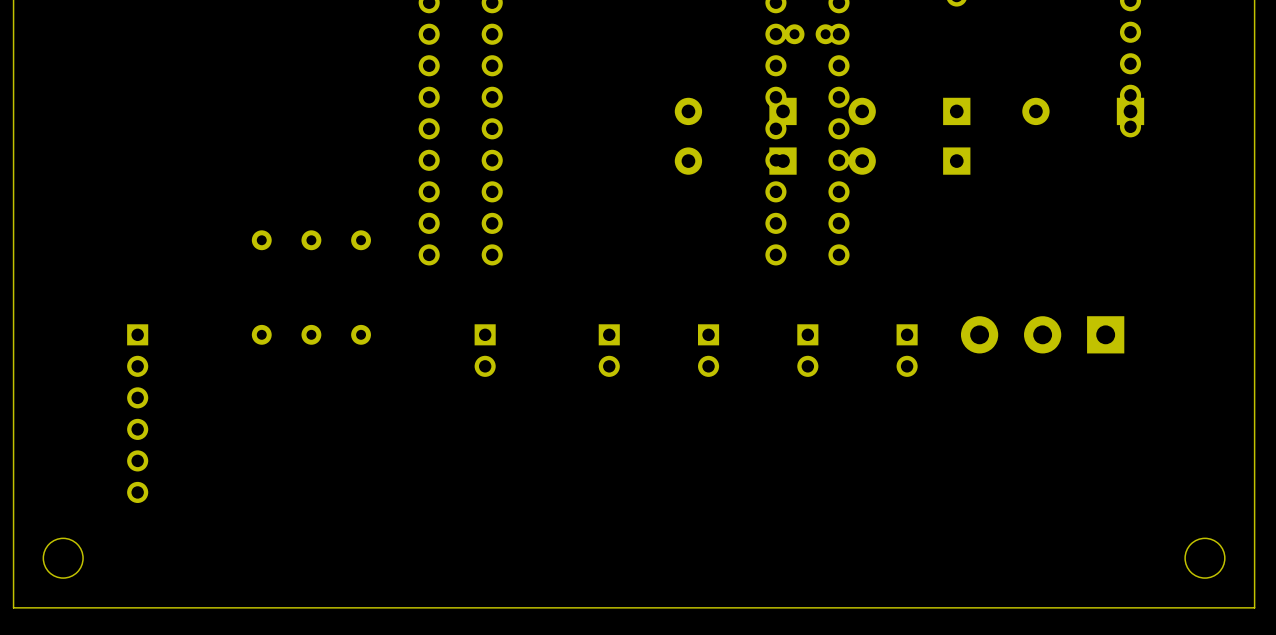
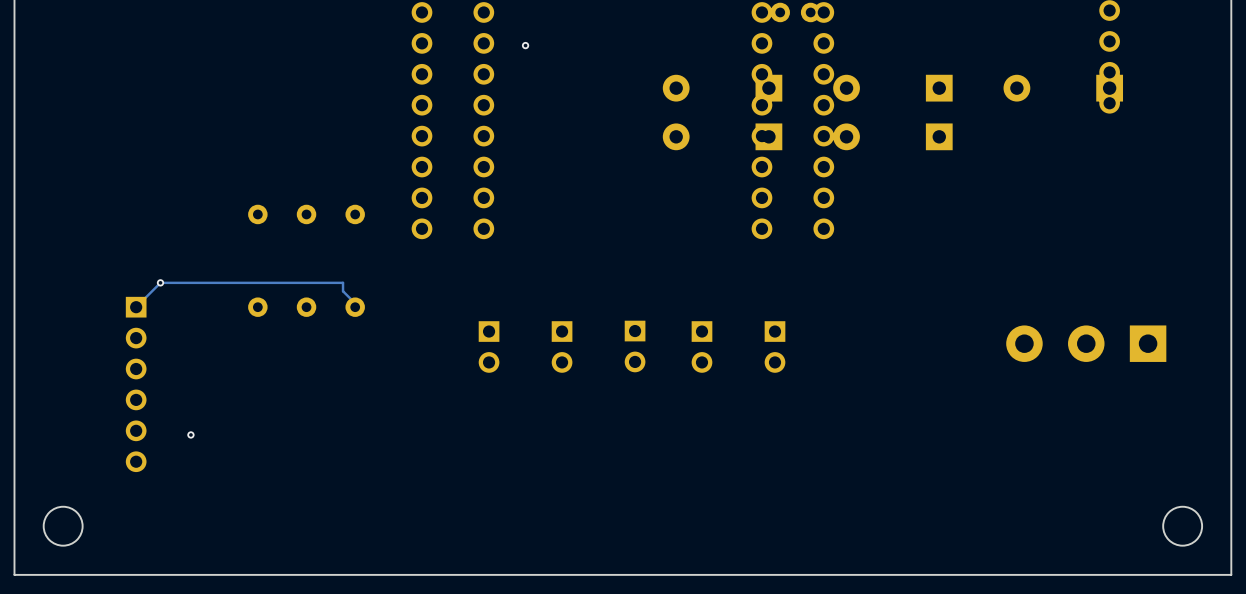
via: none -> (525, 45)
via: none -> (160, 282)
track: none -> (355, 303) (343, 291) (343, 282) (160, 282) (136, 307)
part position: (1042, 334) -> (1086, 343)
part position: (485, 350) -> (489, 346)
part: (609, 350) -> none
part position: (708, 350) -> (701, 346)
part position: (807, 350) -> (775, 346)
part: (907, 350) -> none
part: none -> (635, 346)
part: none -> (562, 346)
via: none -> (190, 434)

